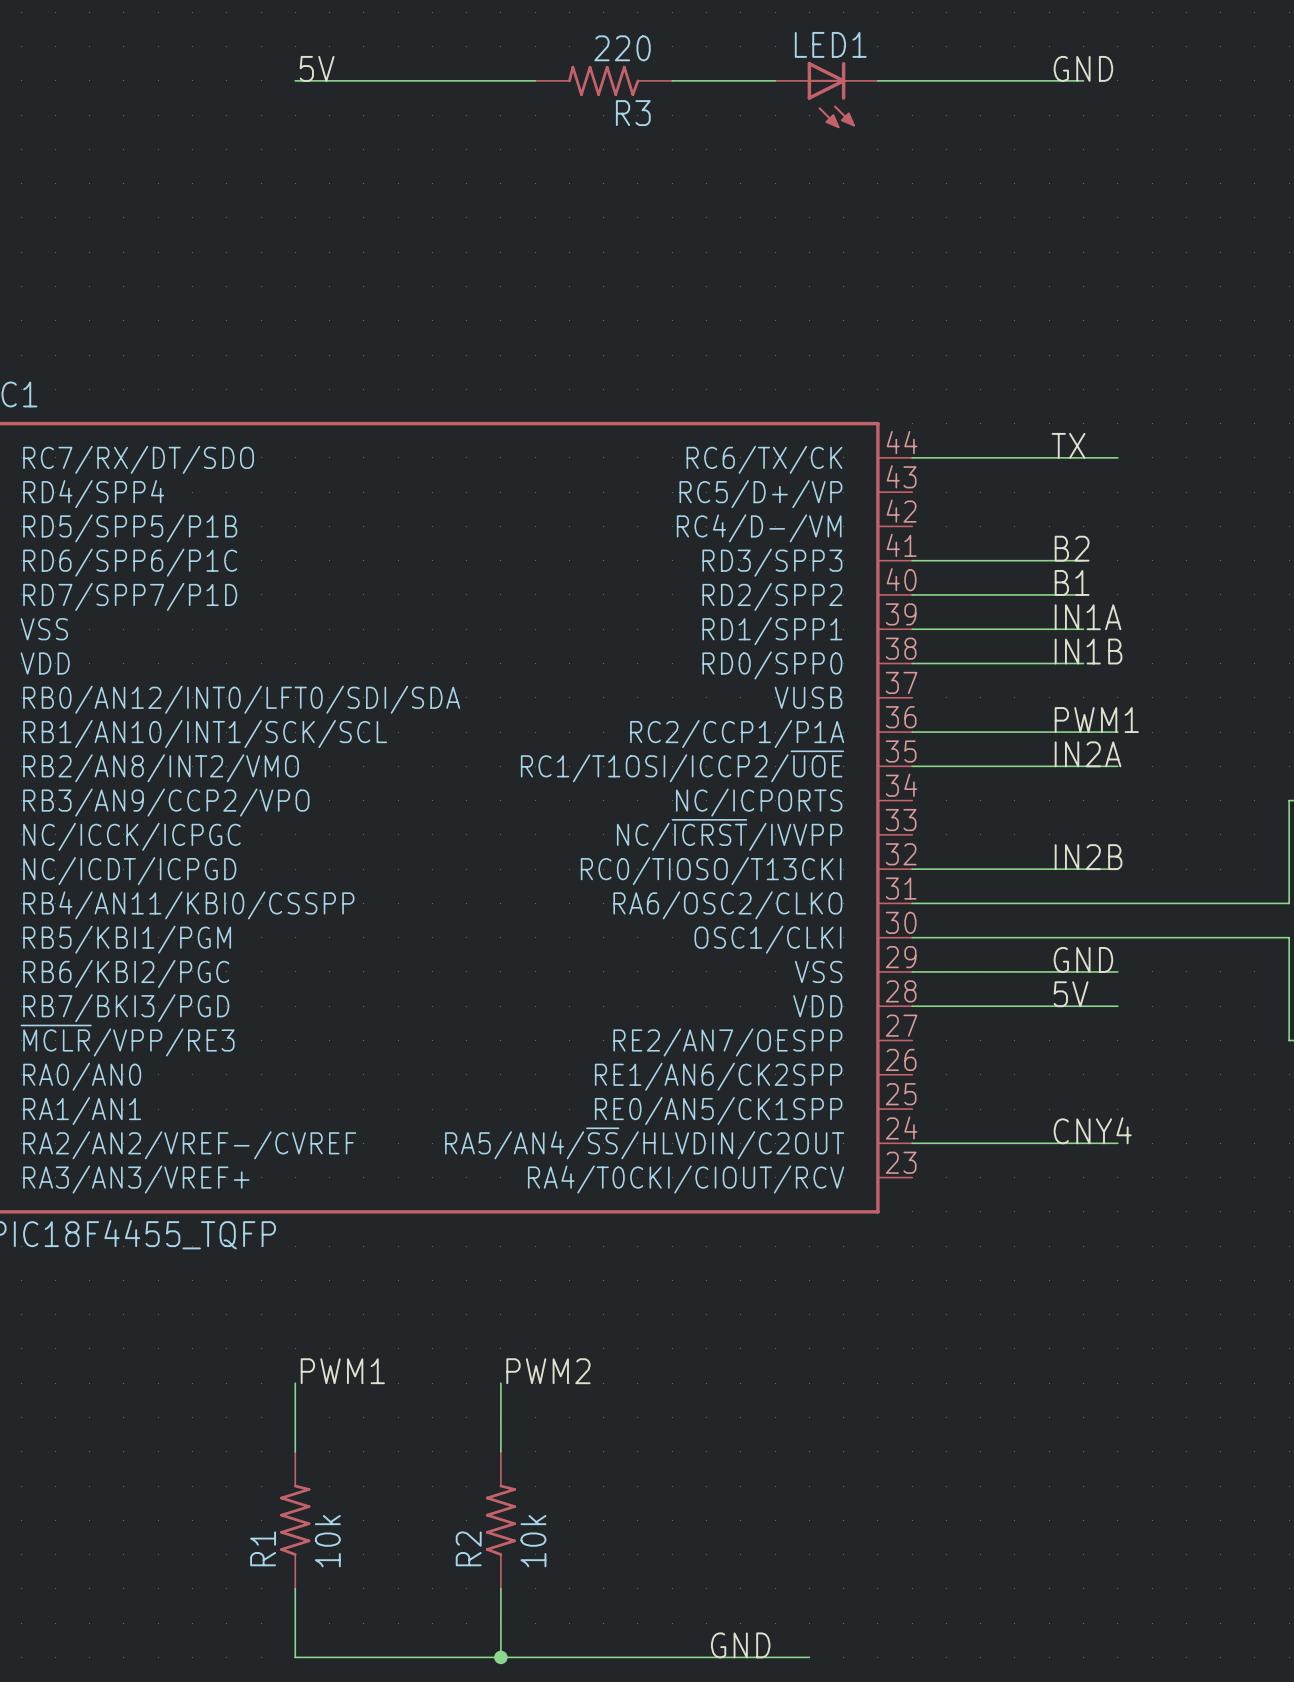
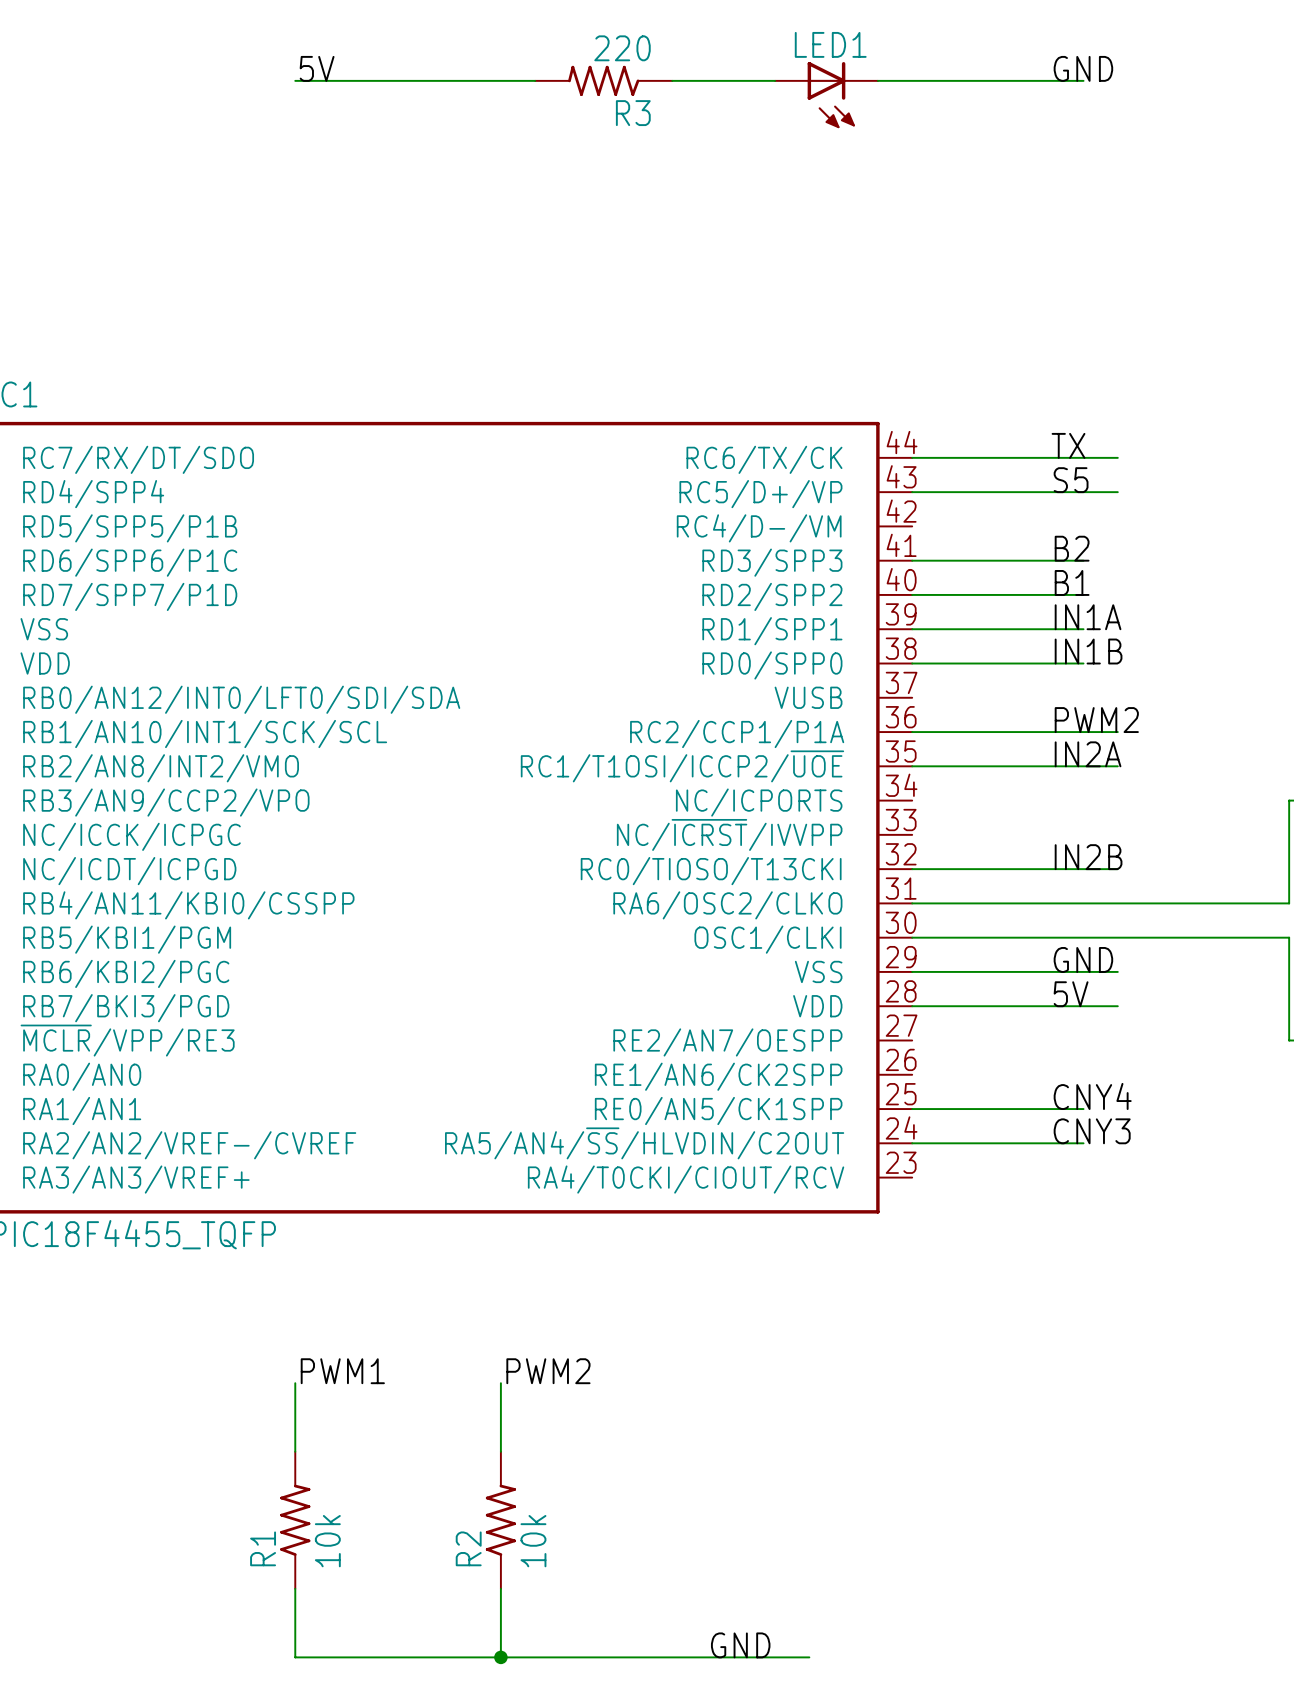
label: none -> S5 (1071, 480)
wire: none -> (912, 492) (1117, 492)
label: PWM1 (1096, 720) -> PWM2 (1096, 720)
label: none -> CNY4 (1092, 1096)
wire: none -> (912, 1109) (1083, 1109)
label: CNY4 (1092, 1130) -> CNY3 (1092, 1131)
wire: (1083, 1143) (1117, 1143) -> none

